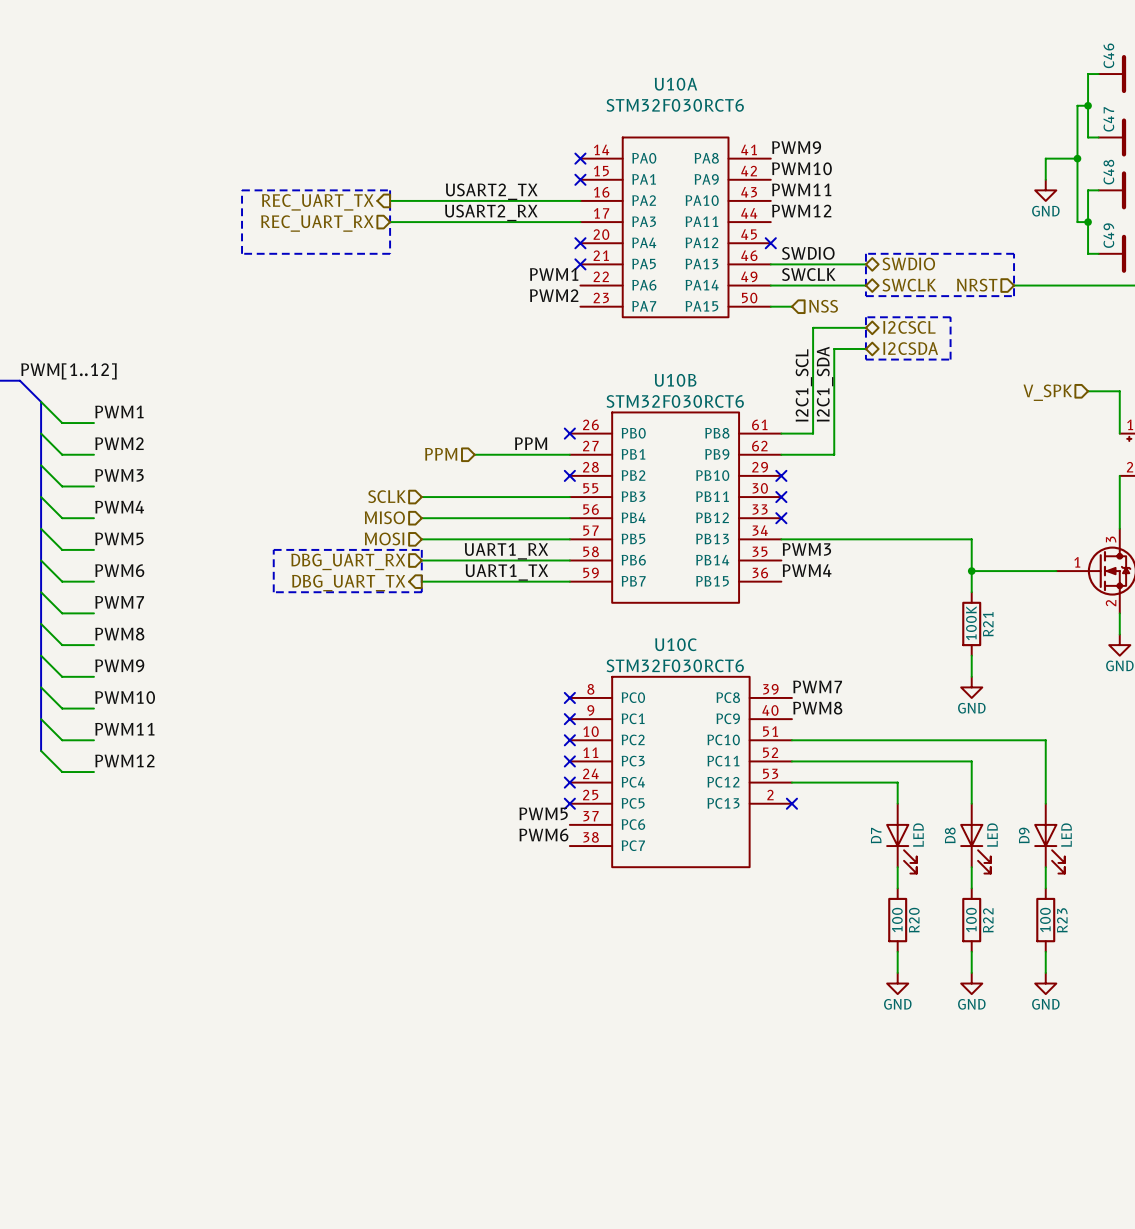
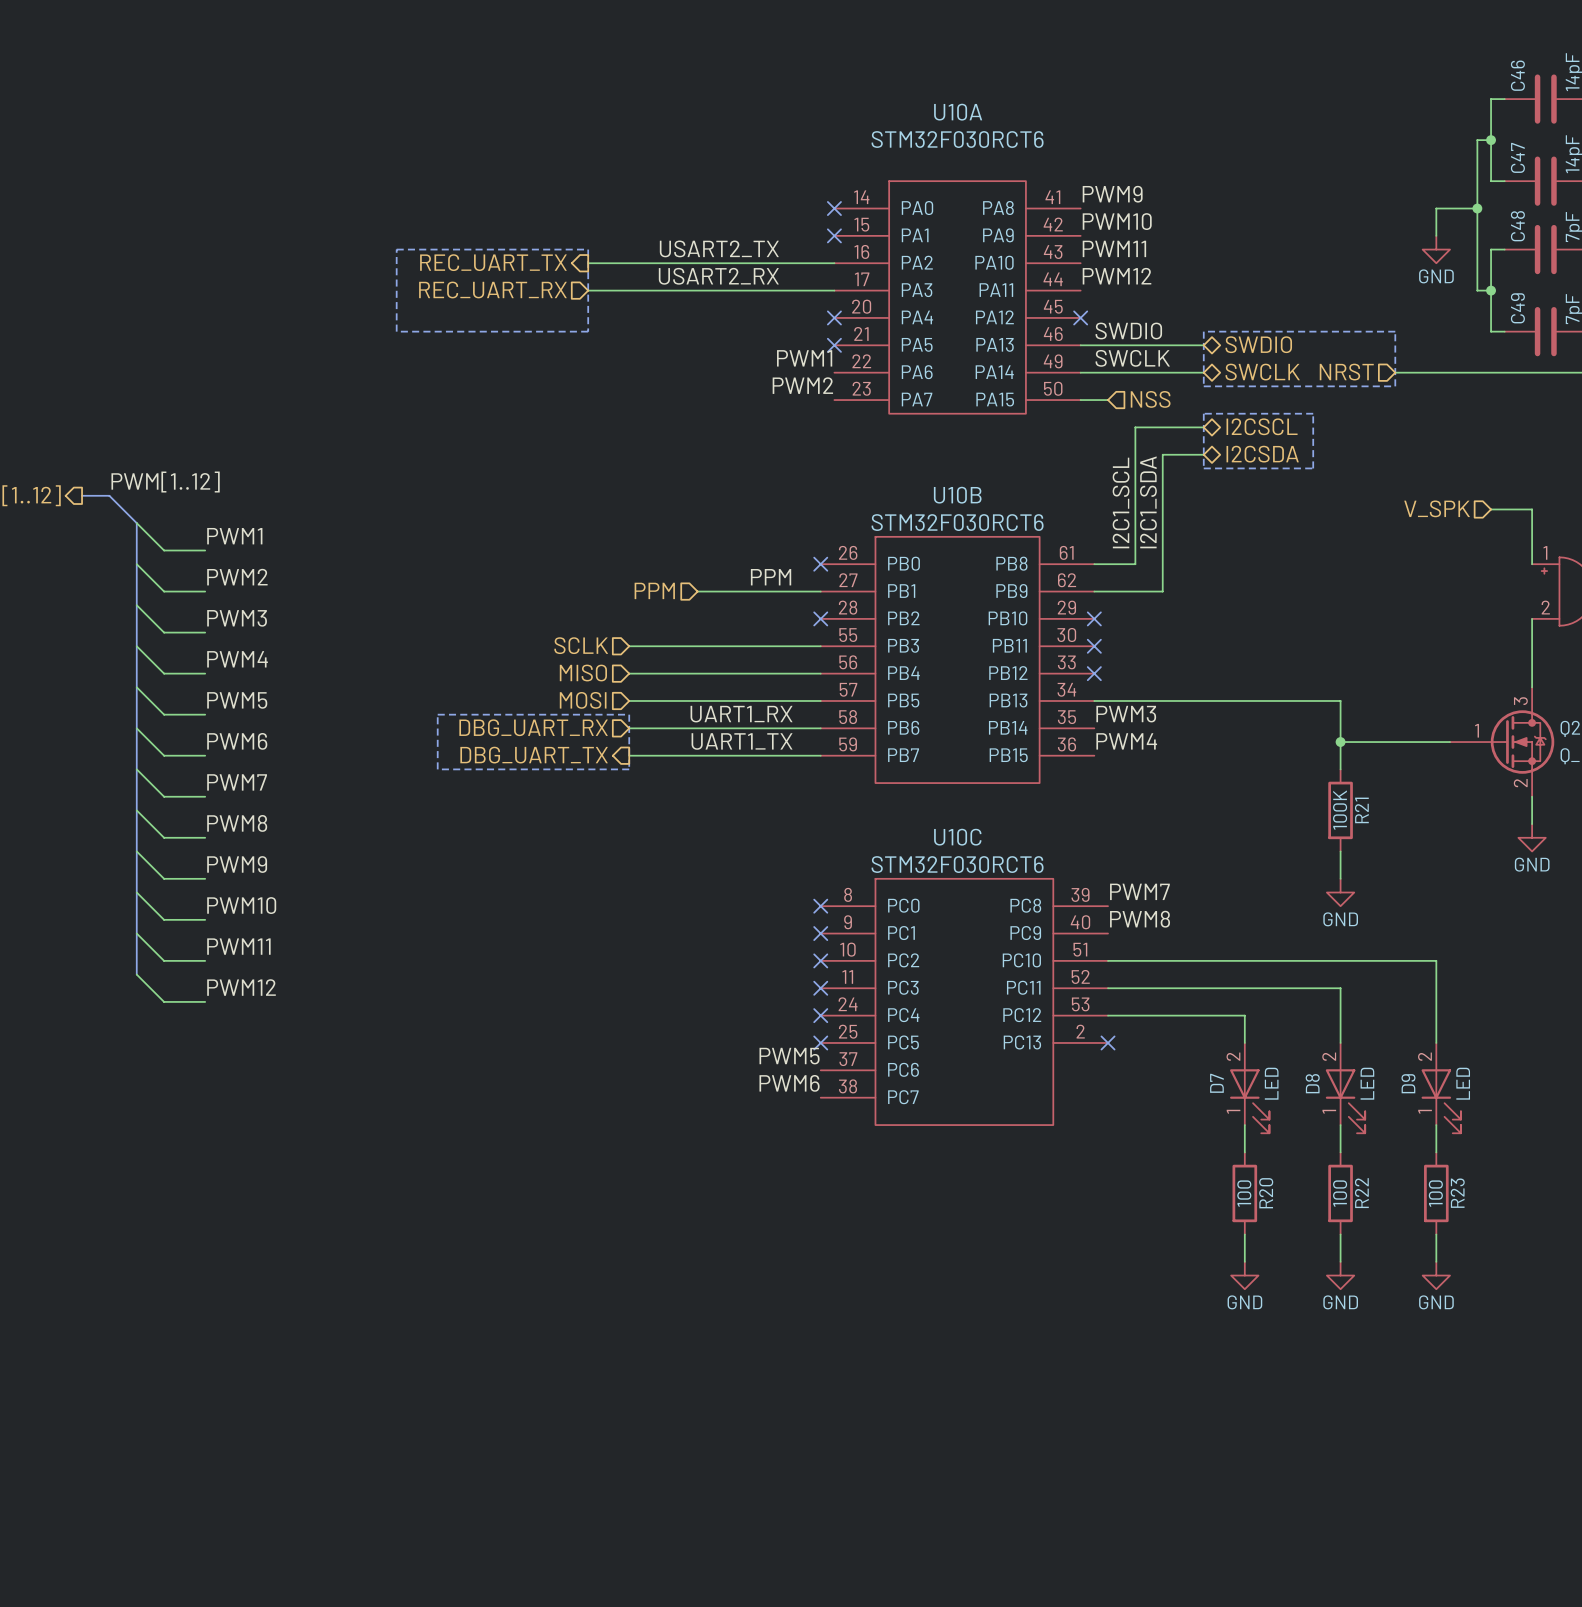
D7 pin number: none -> 2 (1233, 1056)
D8 pin number: none -> 2 (1329, 1056)
D9 pin number: none -> 2 (1424, 1056)
D7 pin number: none -> 1 (1233, 1111)
D8 pin number: none -> 1 (1329, 1111)
D9 pin number: none -> 1 (1425, 1111)

